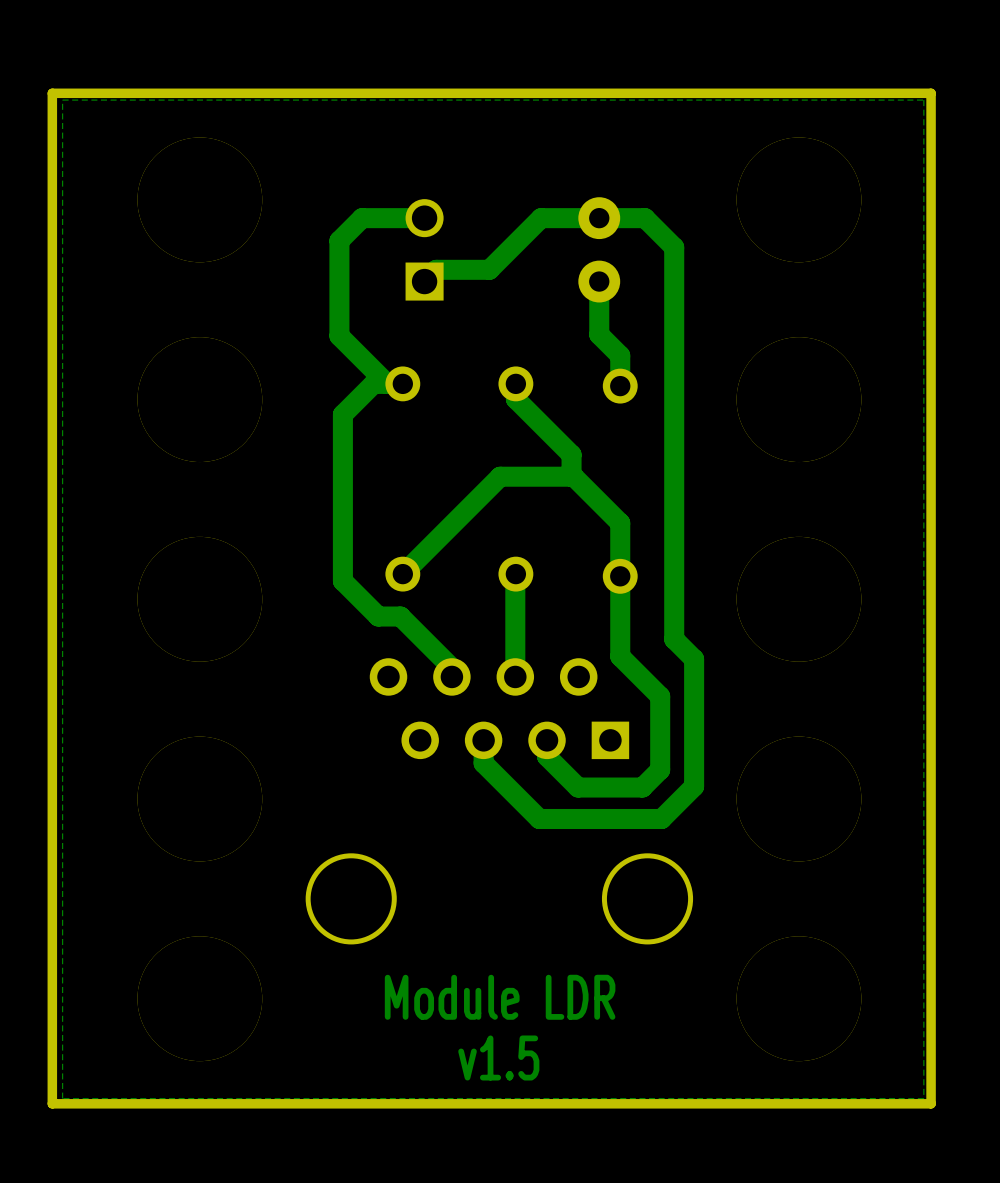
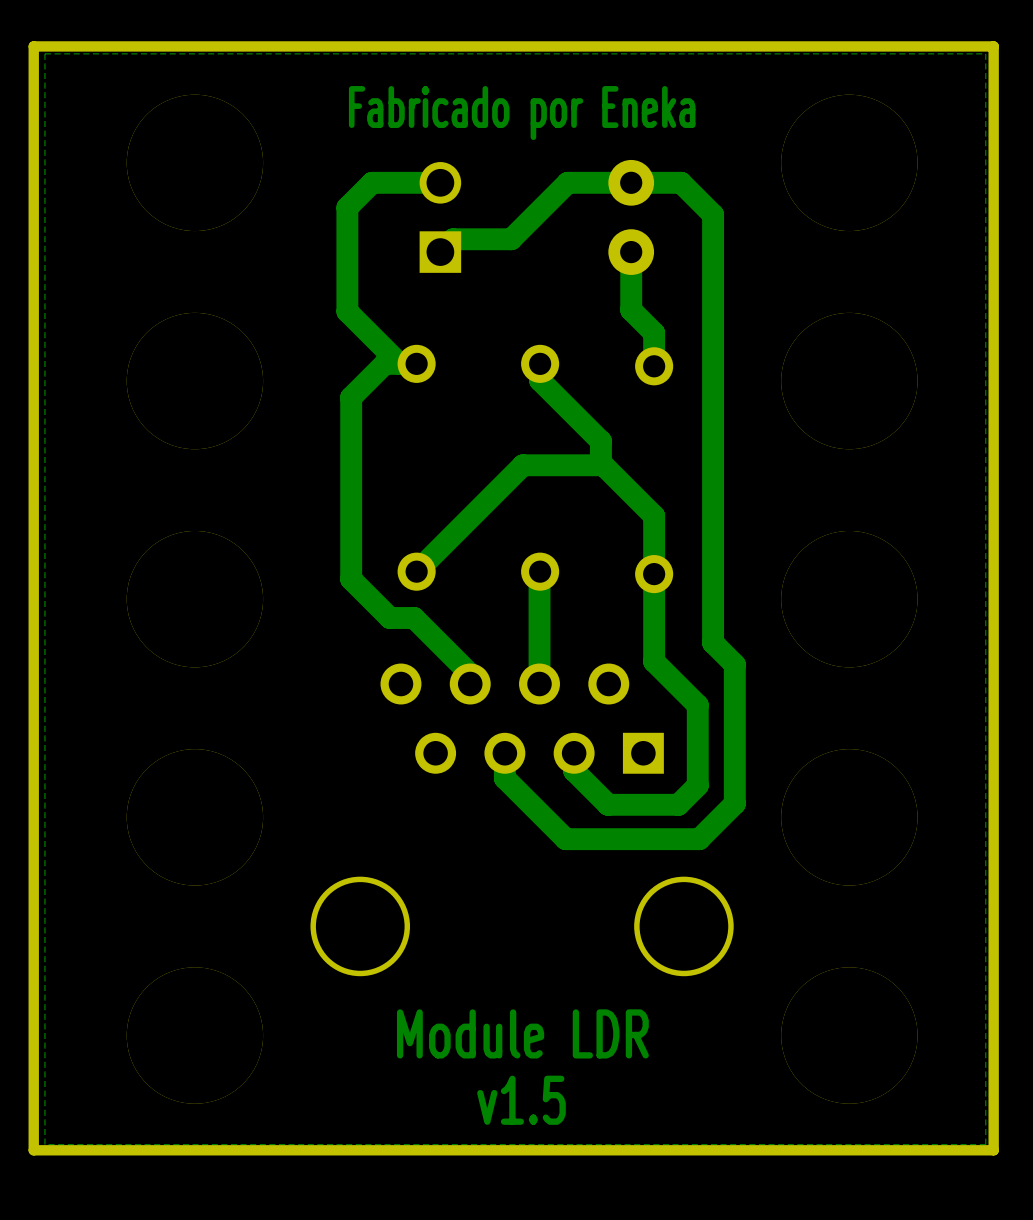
text: none -> Fabricado por Eneka (522, 113)

